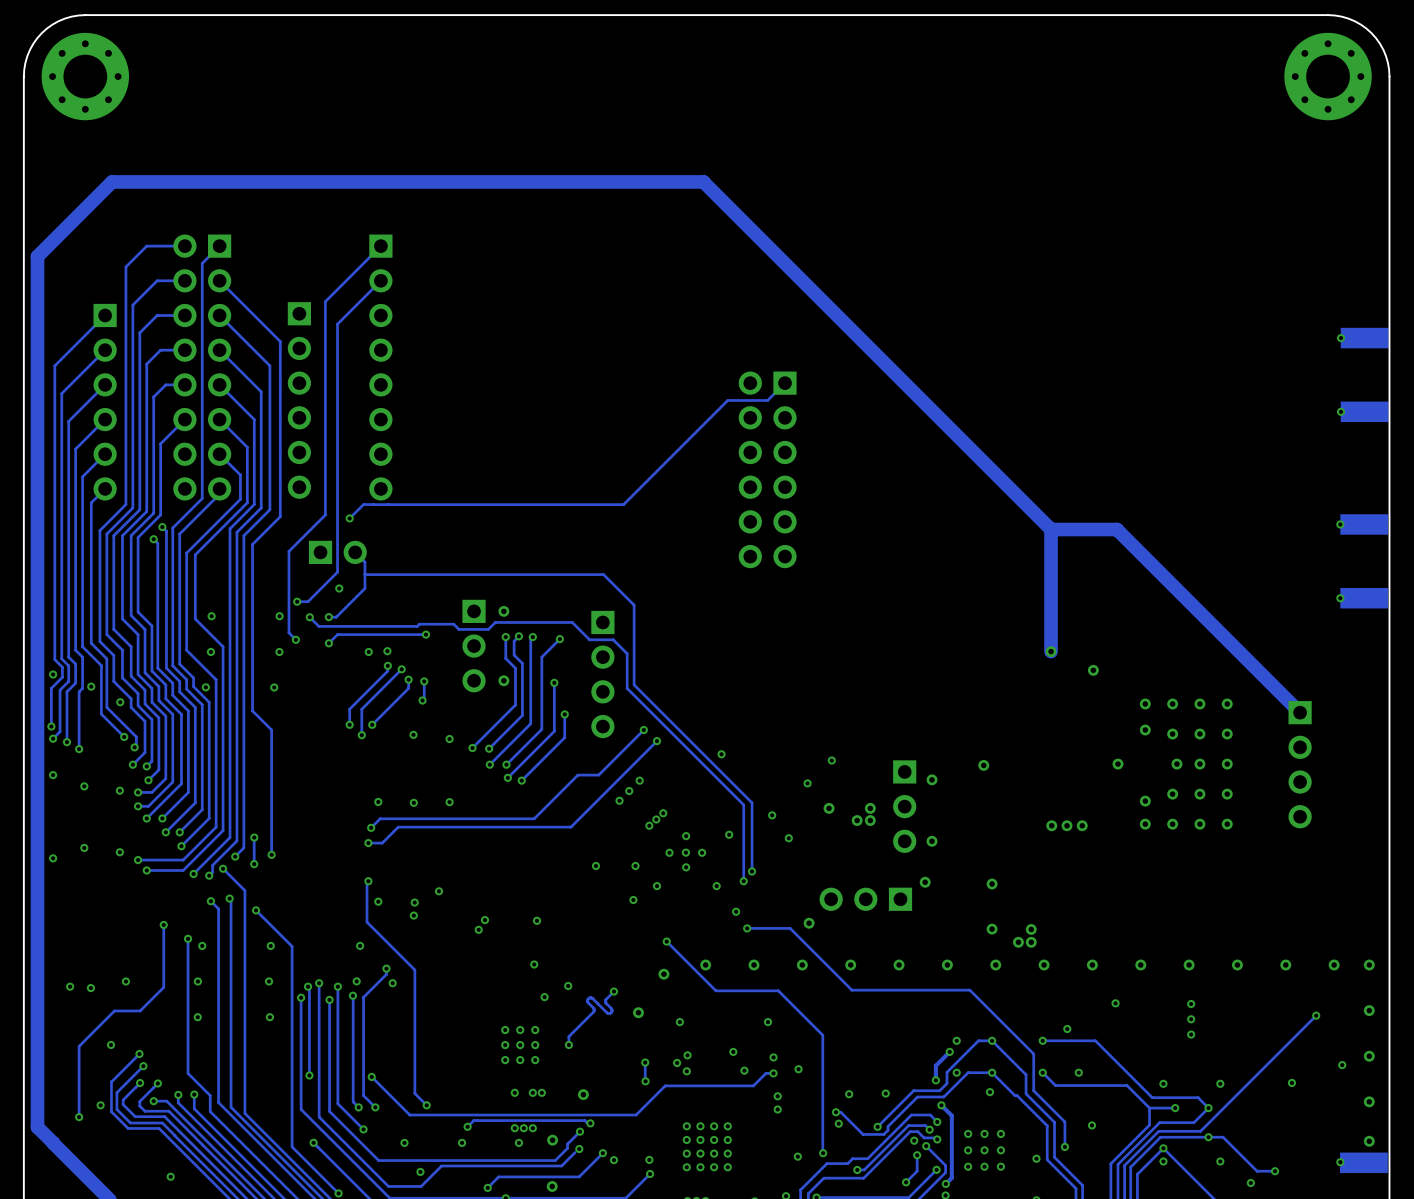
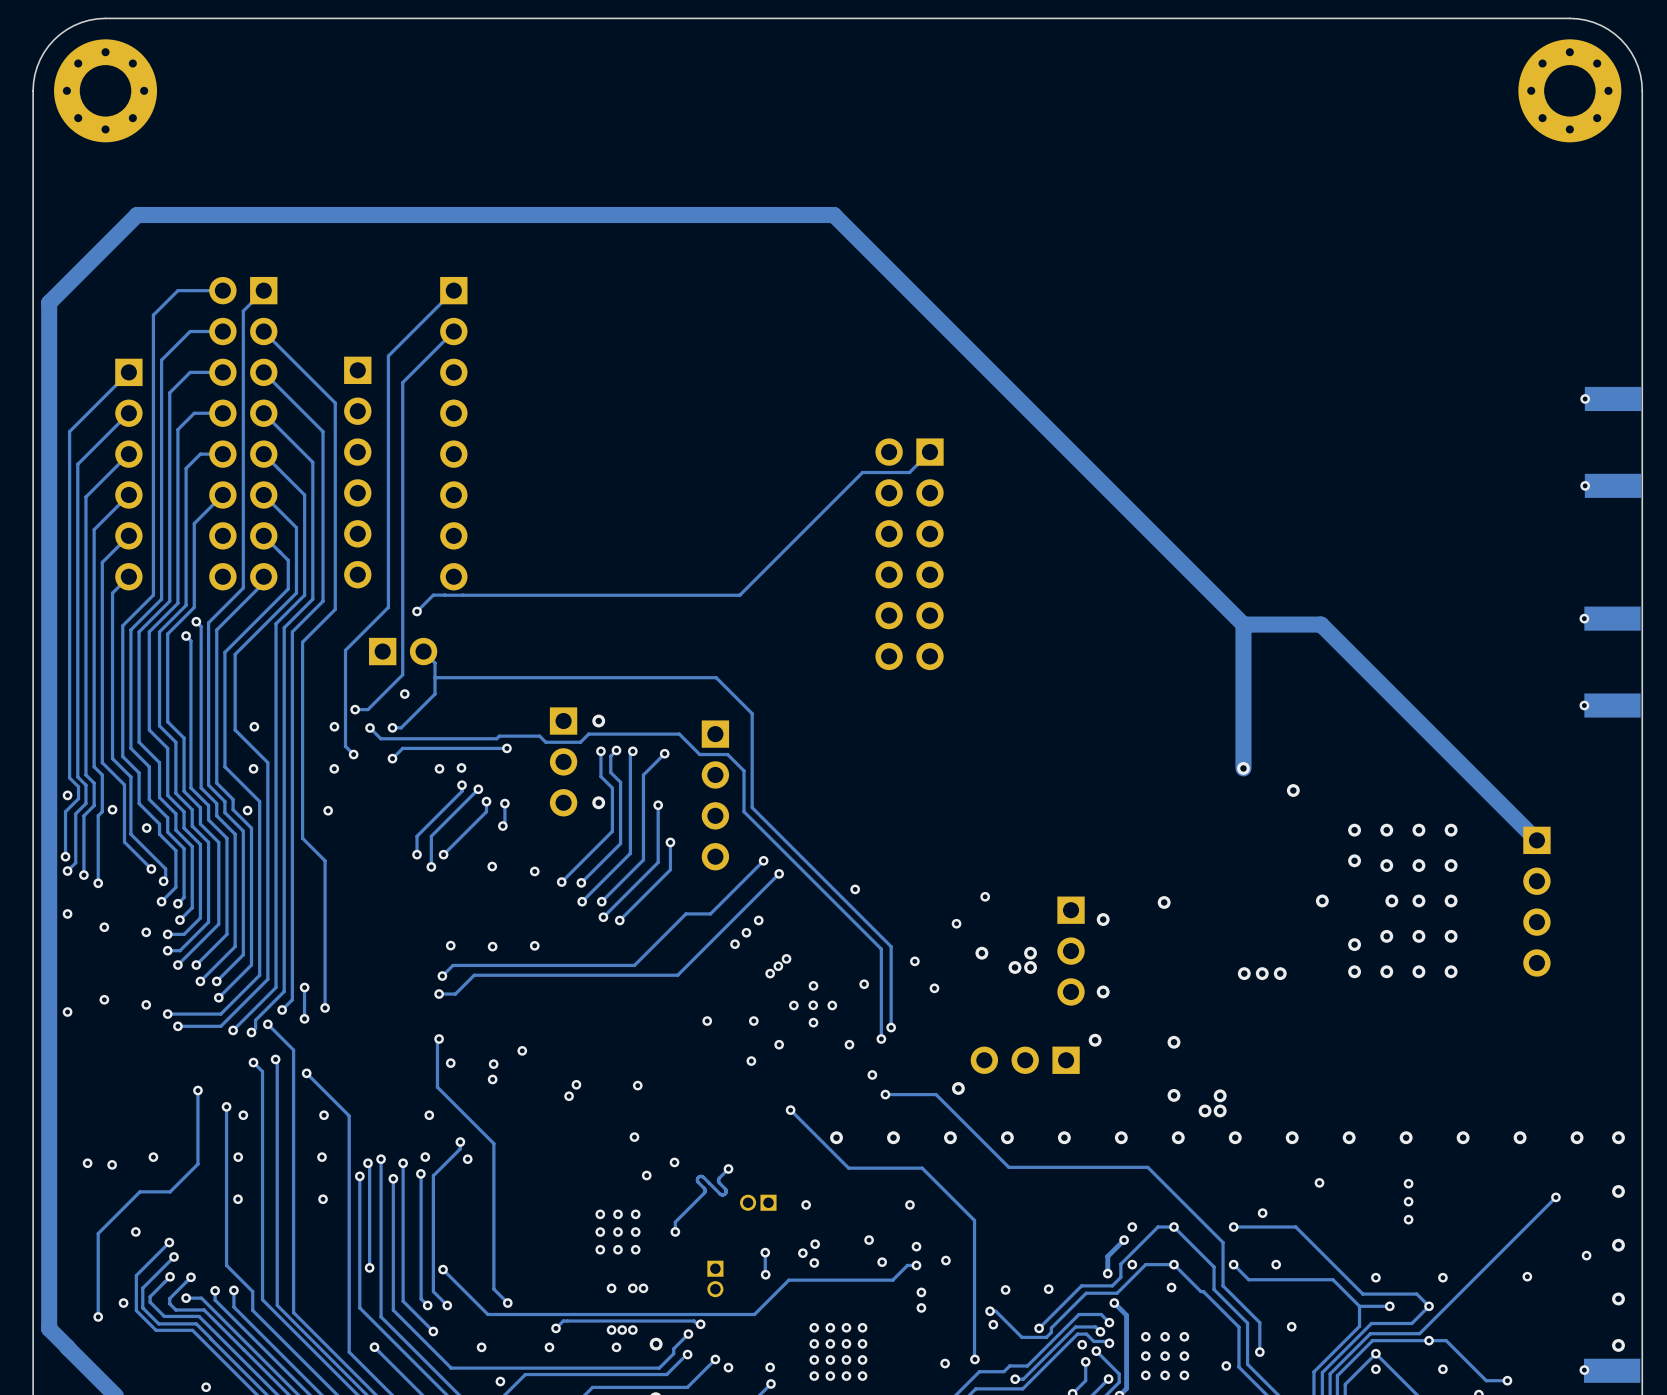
via: (663, 974) -> none
via: (638, 1012) -> none
part: none -> (758, 1202)
part: none -> (715, 1278)
via: (583, 1094) -> none

